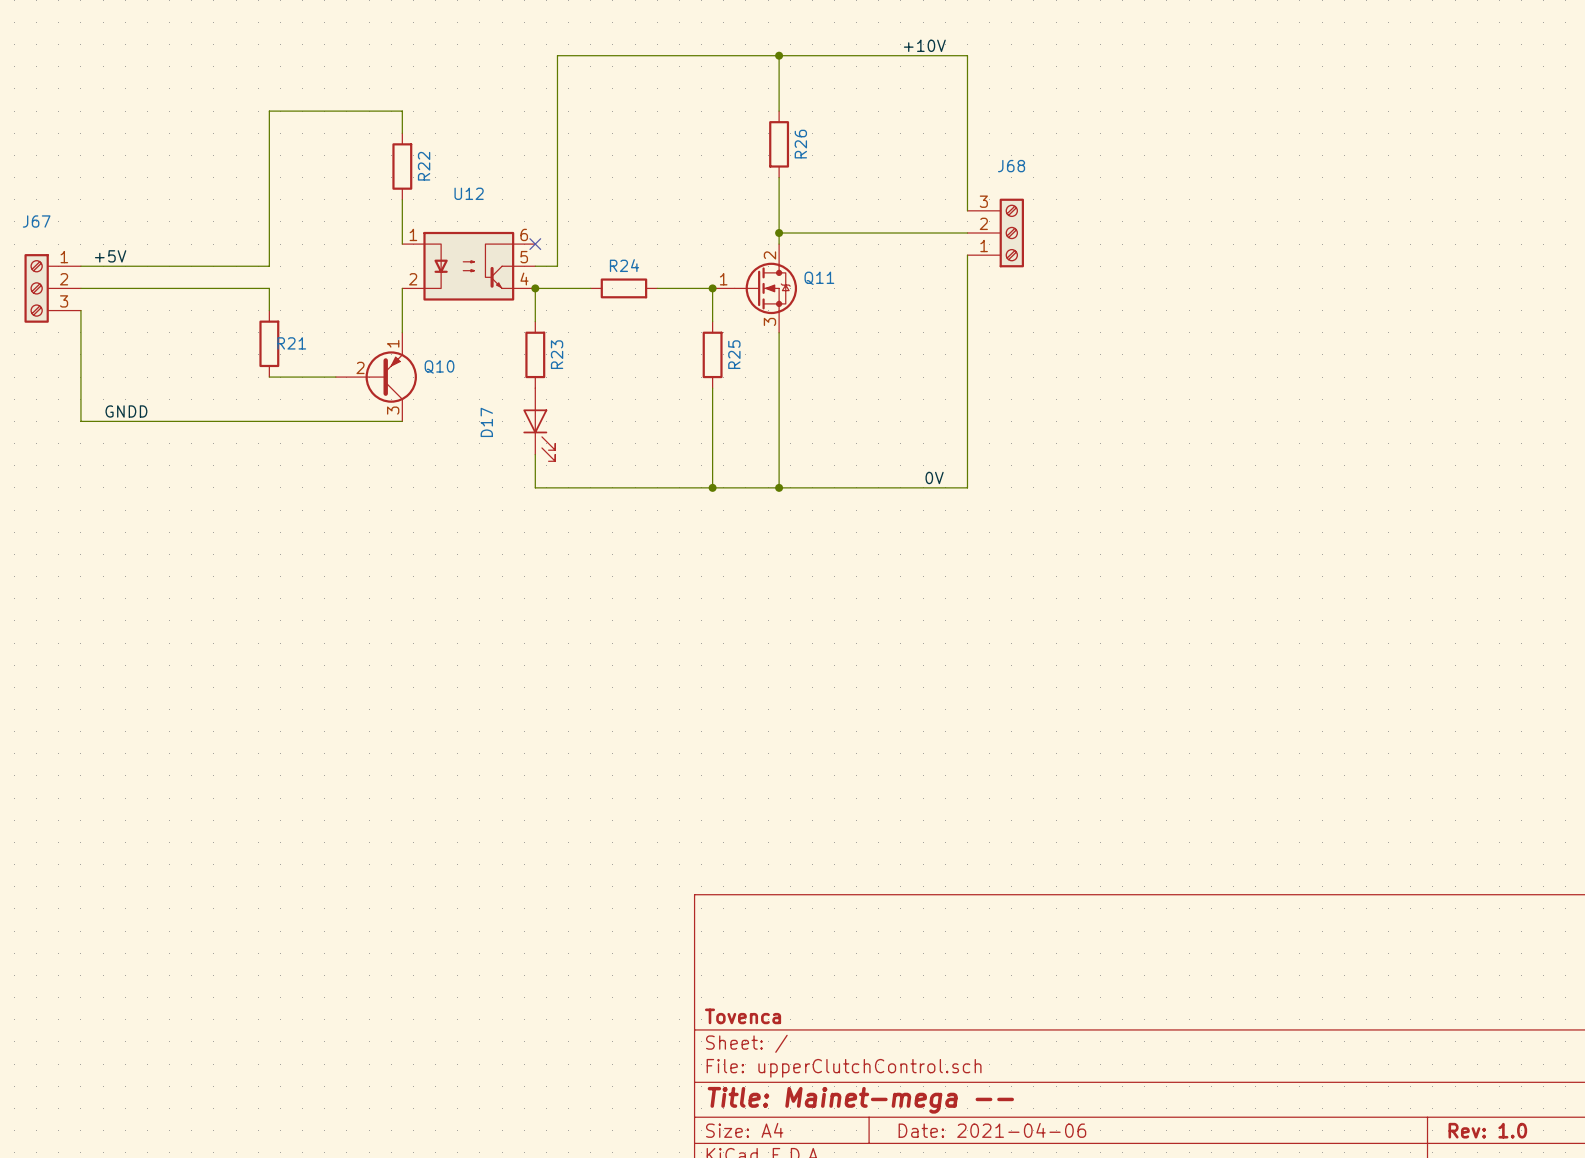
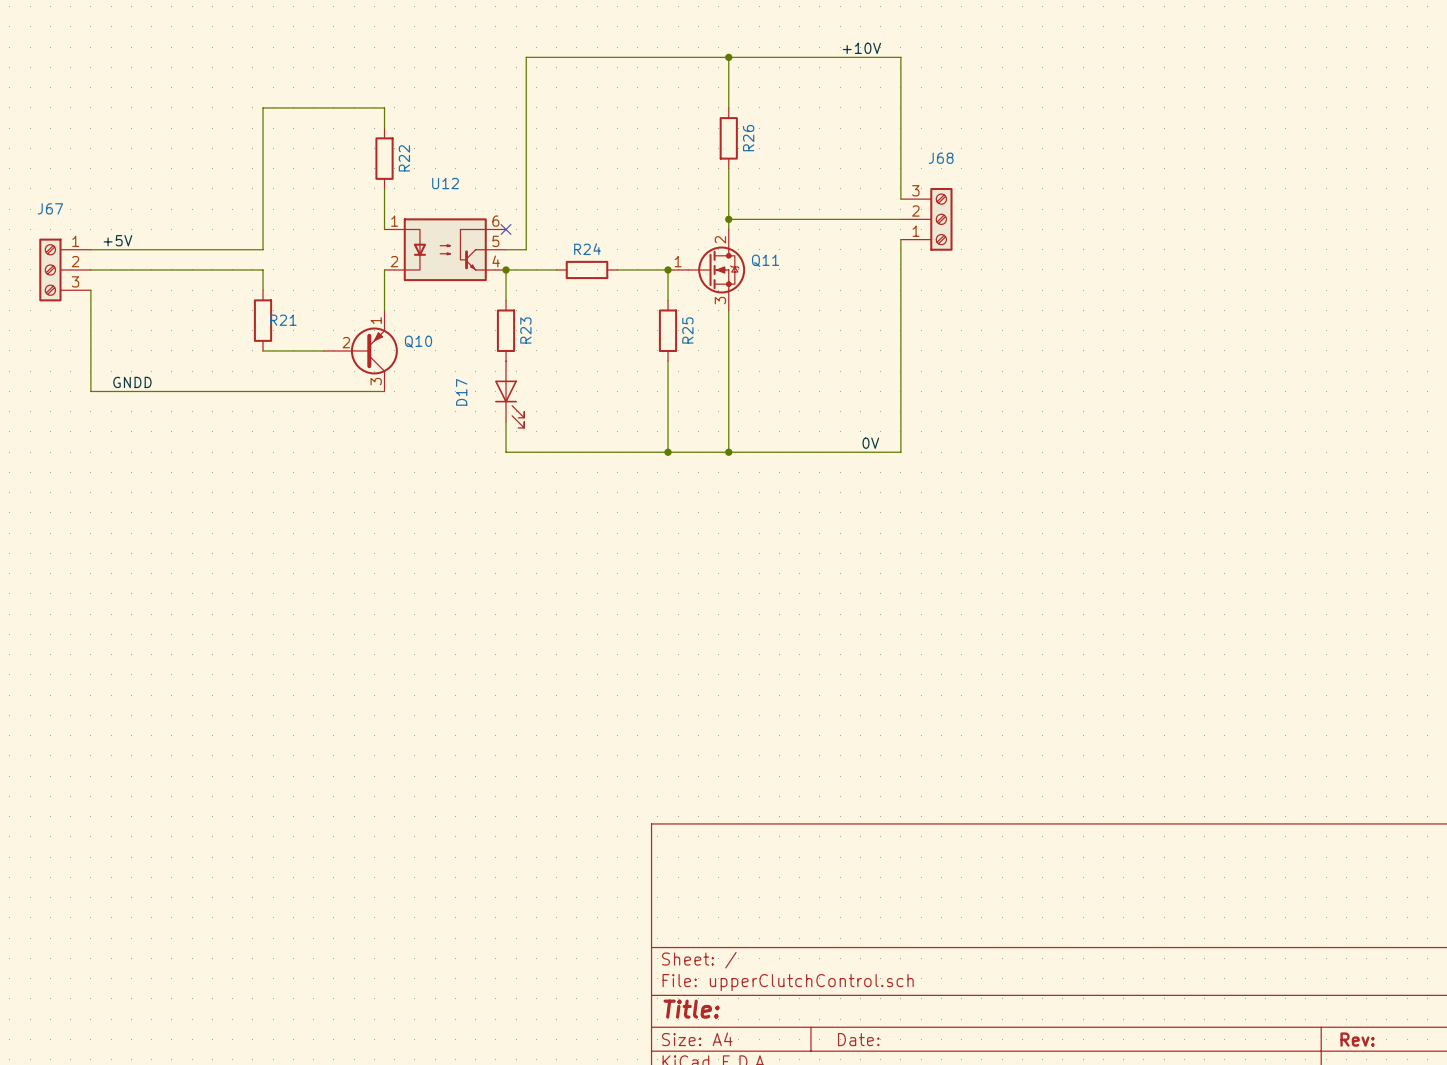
title block: Tovenca (743, 1016) -> none
title block: Title: Mainet-mega -- (860, 1100) -> Title: (691, 1009)
title block: Date: 2021-04-06 (992, 1130) -> Date: (858, 1039)
title block: Rev: 1.0 (1487, 1130) -> Rev: (1357, 1039)

